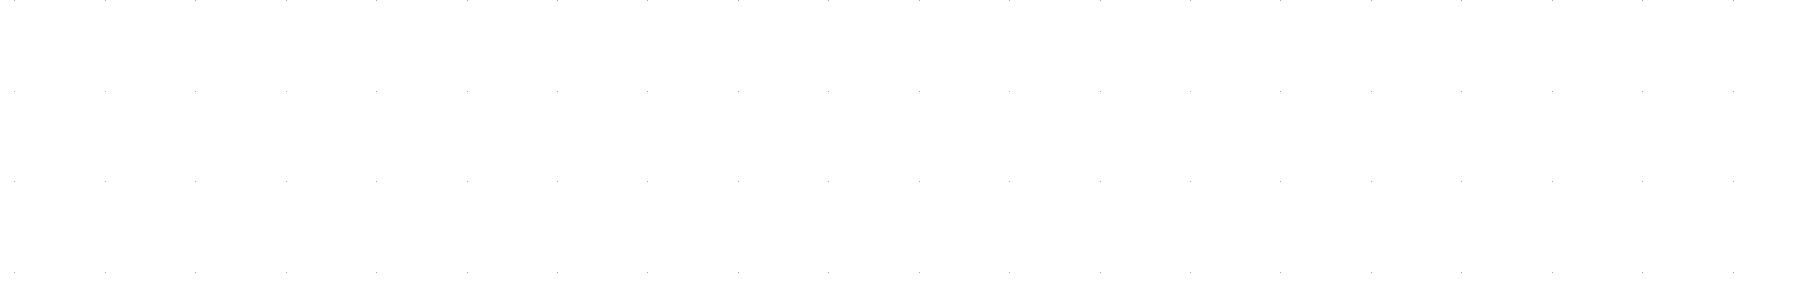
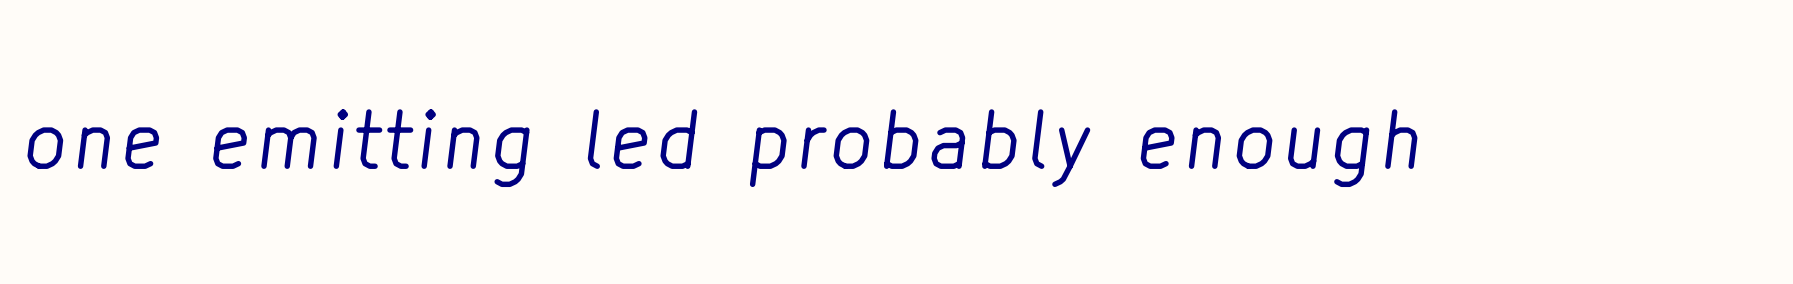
text: none -> one emitting led probably enough (722, 148)

